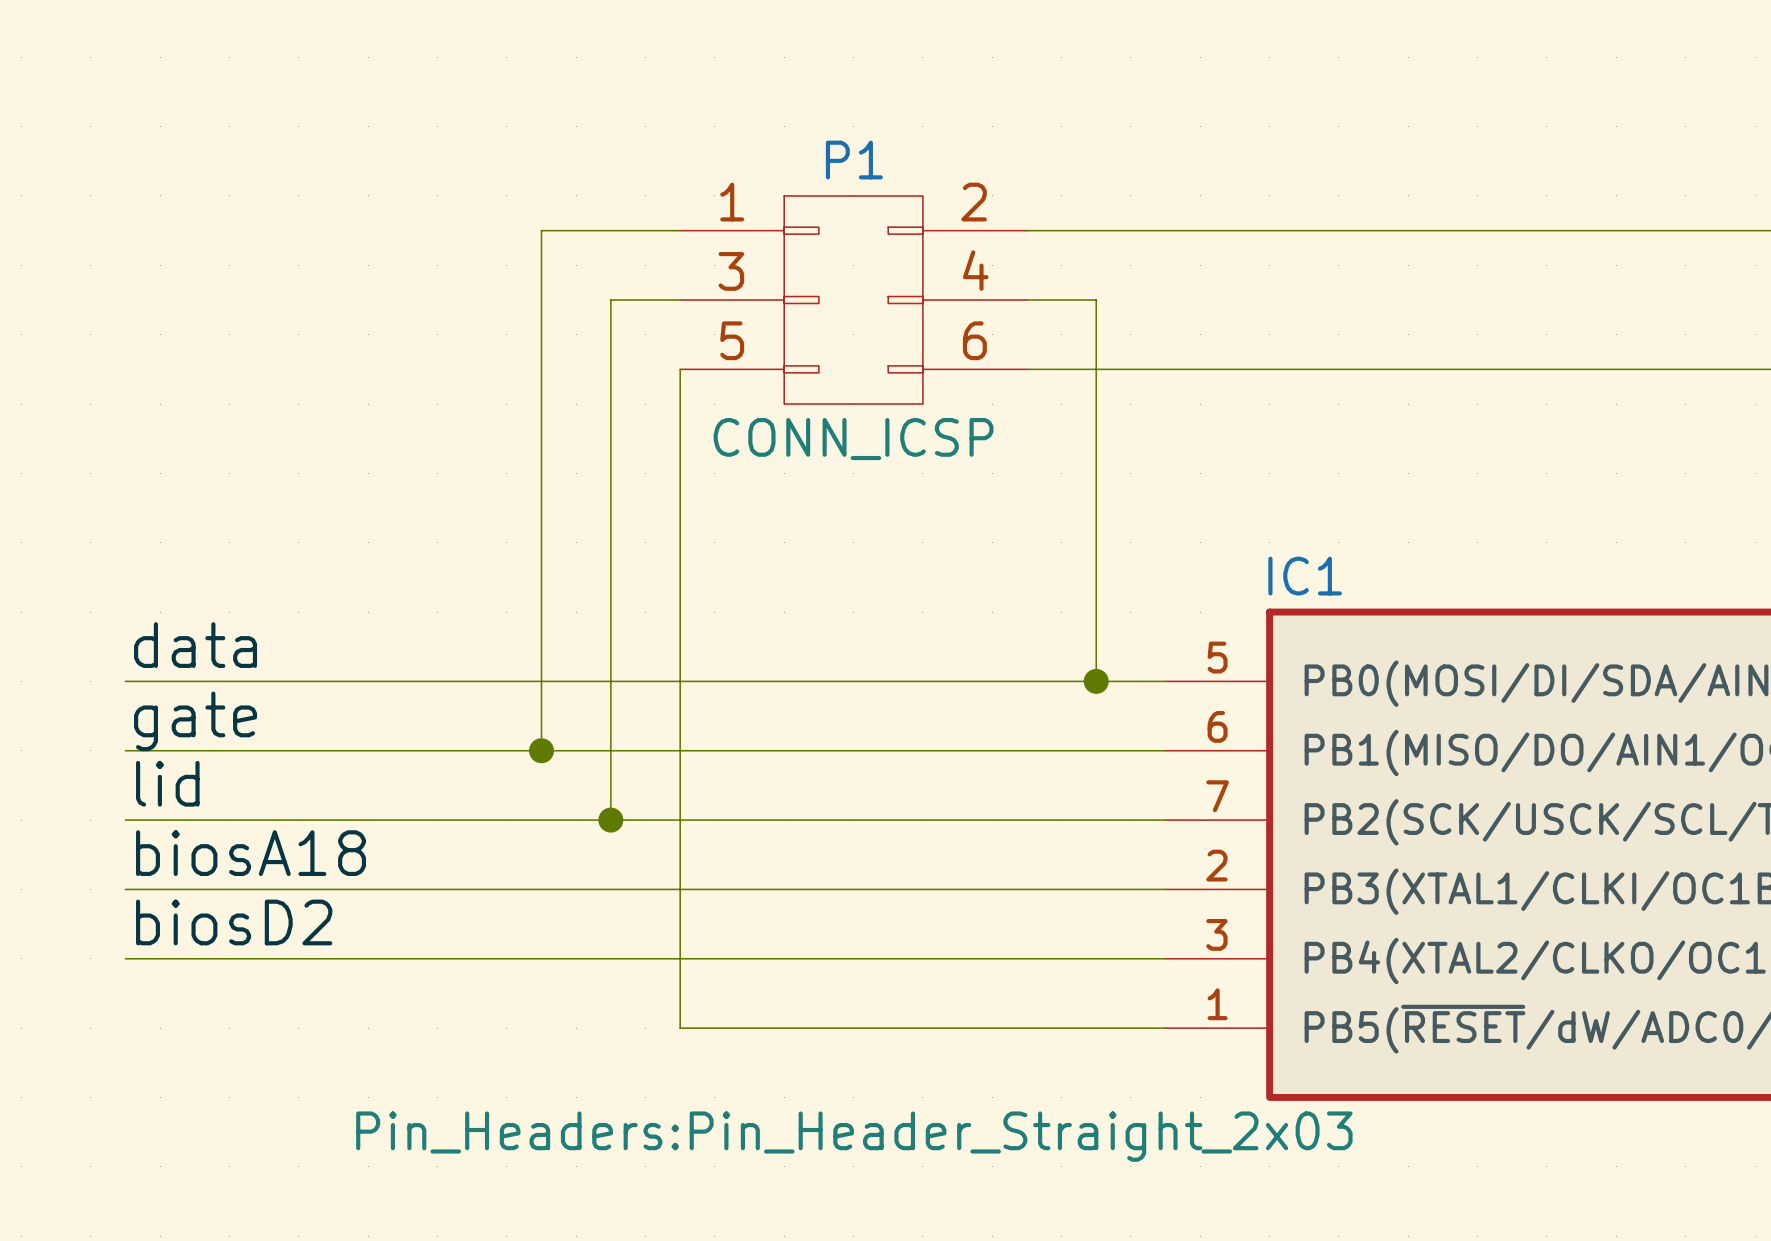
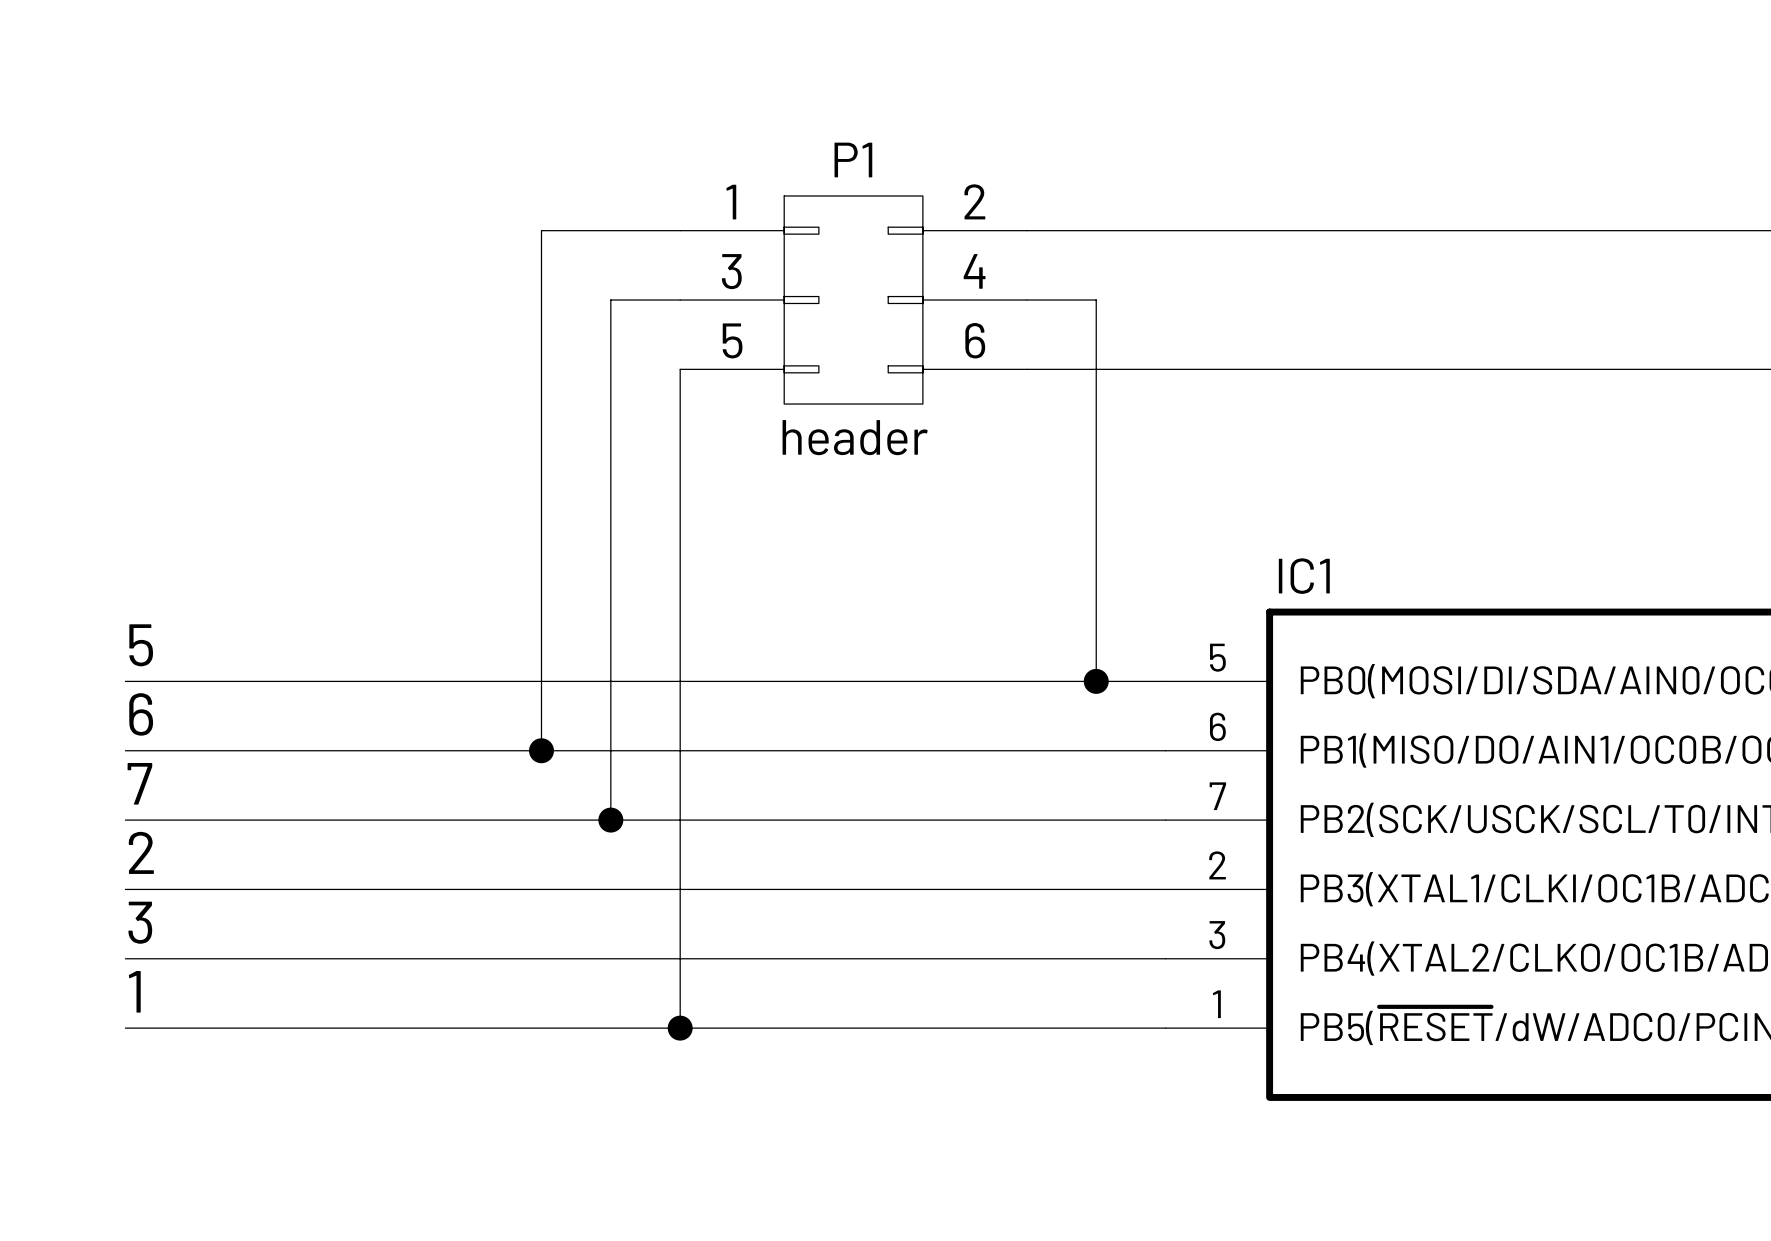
P1 value: CONN_ICSP (853, 439) -> header (855, 437)
label: data (195, 645) -> 5 (141, 645)
label: gate (195, 721) -> 6 (141, 714)
label: lid (167, 783) -> 7 (139, 783)
label: biosA18 (251, 853) -> 2 (141, 852)
label: biosD2 (234, 922) -> 3 (140, 922)
label: none -> 1 (134, 991)
wire: none -> (125, 1028) (680, 1028)
junction: none -> (680, 1028)
P1 text: Pin_Headers:Pin_Header_Straight_2x03 (854, 1136) -> none

